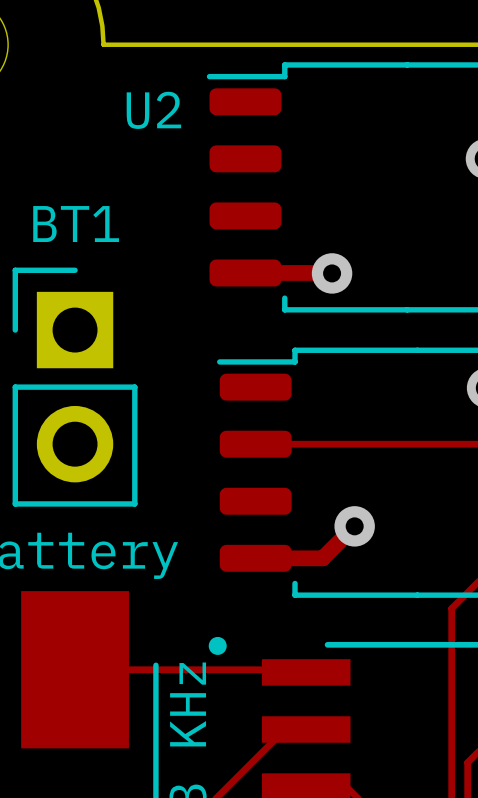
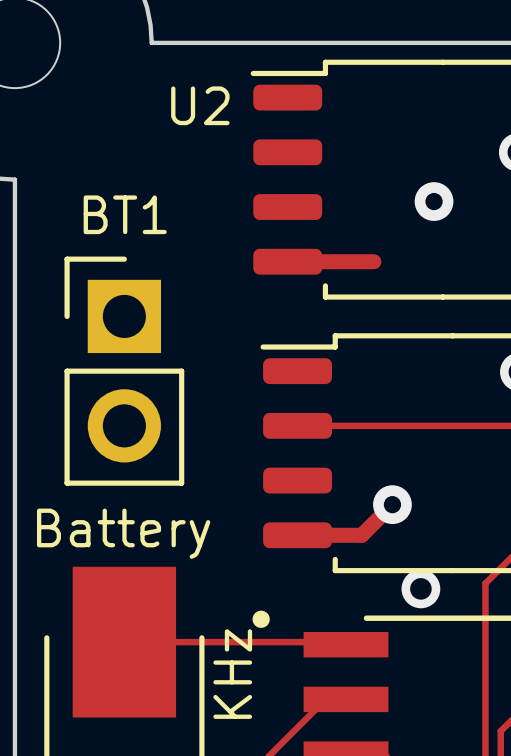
via position: (332, 273) -> (434, 201)
via: none -> (420, 588)

